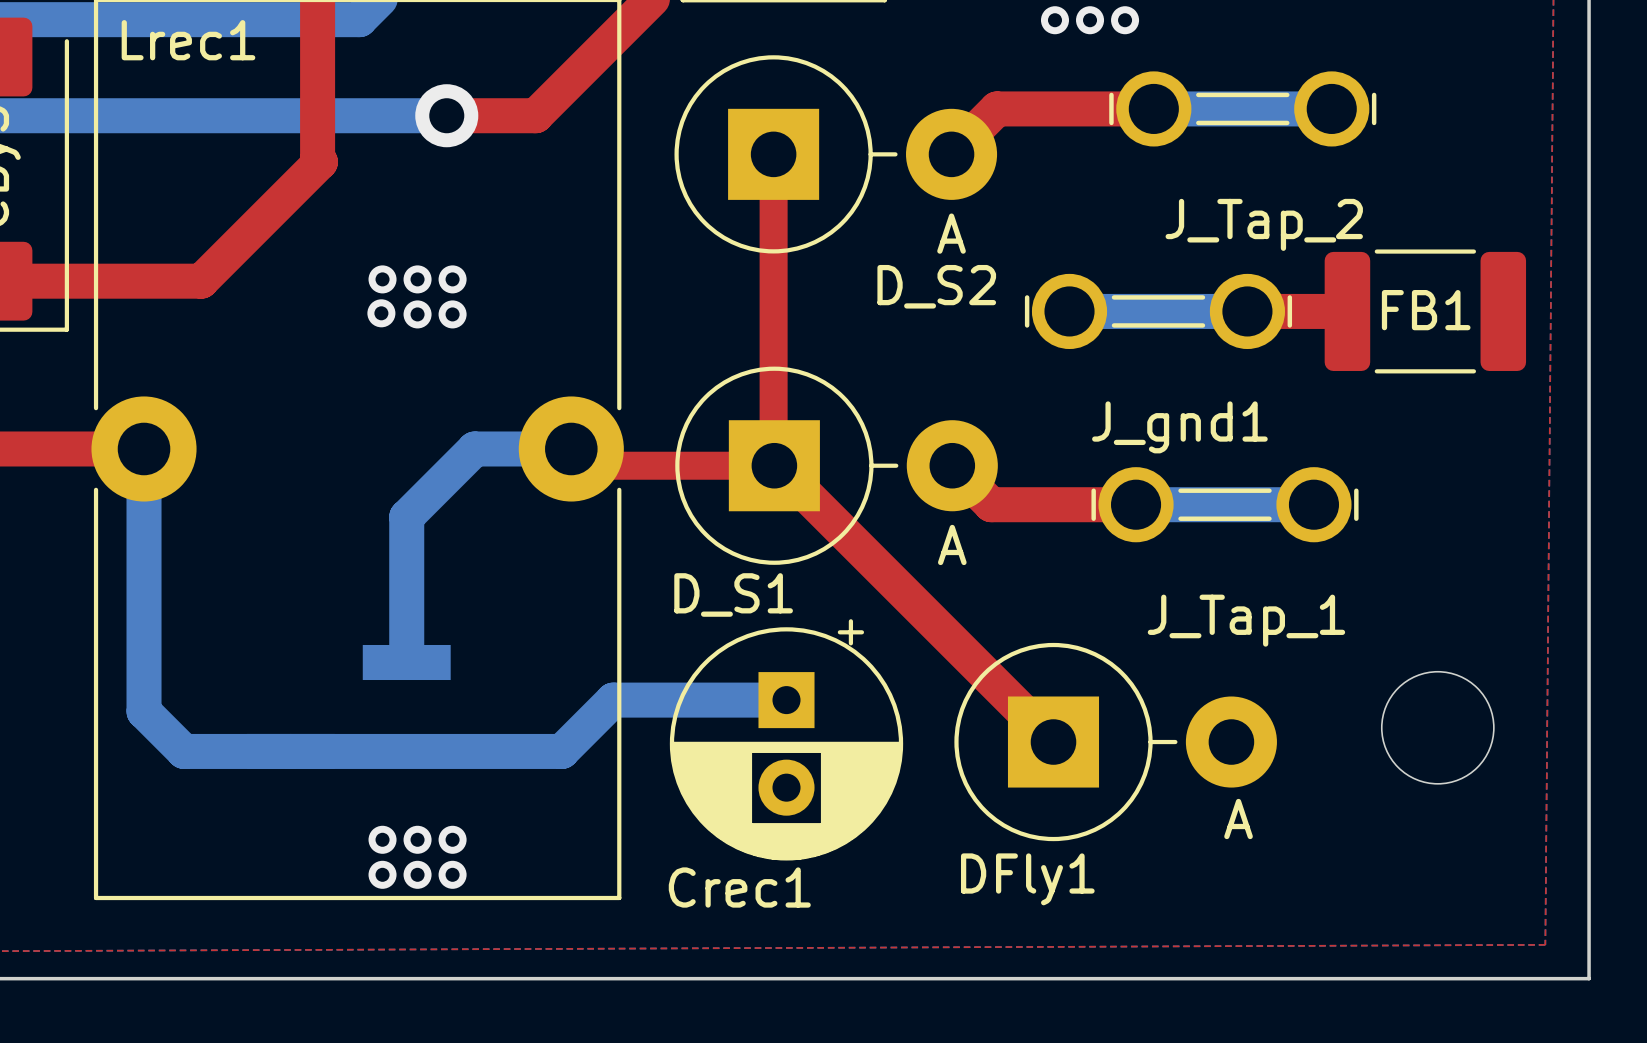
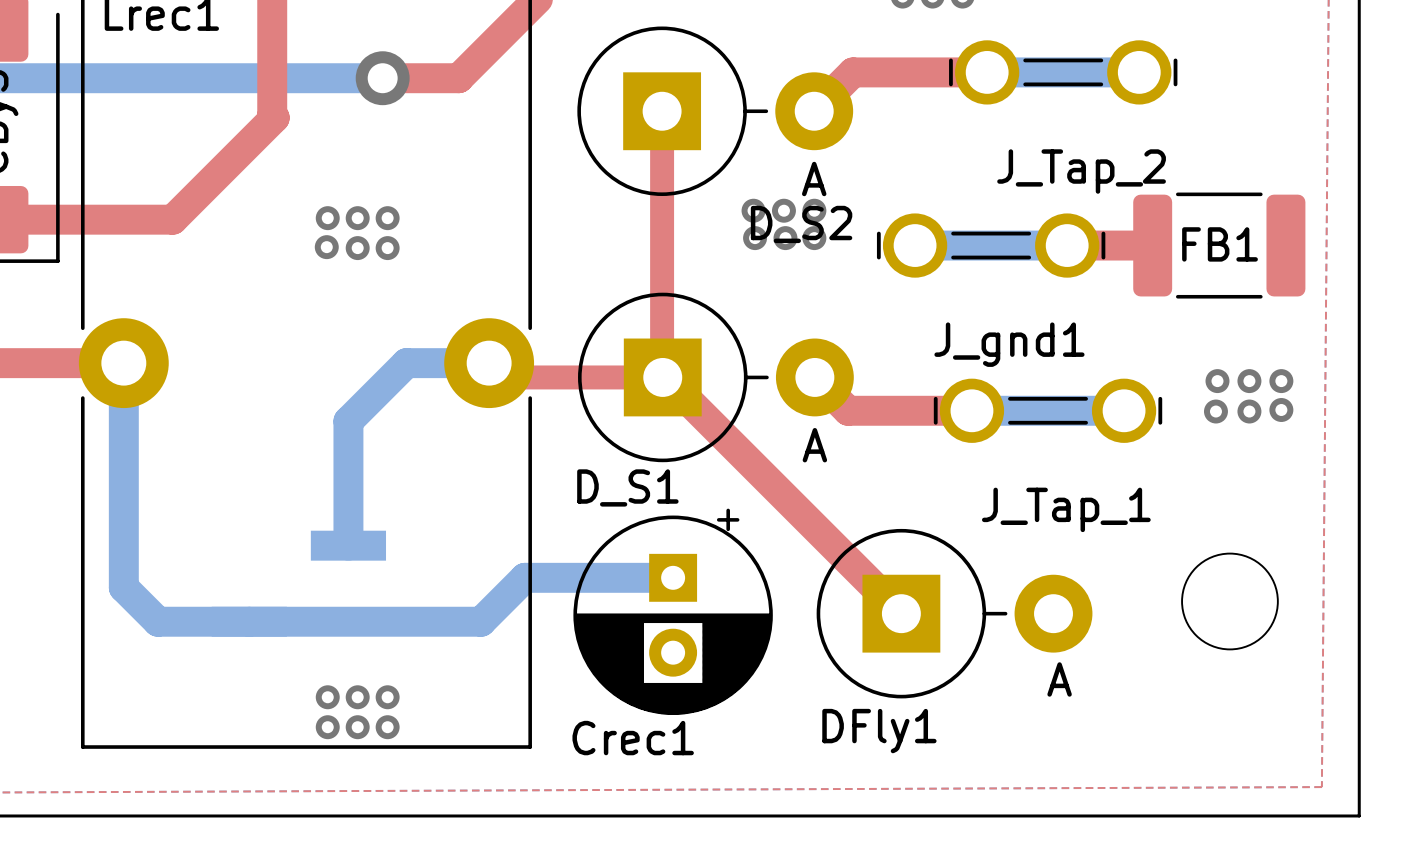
via: none -> (753, 210)
via: none -> (783, 210)
via: none -> (814, 210)
via: none -> (755, 238)
via: none -> (785, 238)
via: none -> (814, 238)
via: none -> (1217, 381)
via: none -> (1249, 381)
via: none -> (1281, 381)
via: none -> (1281, 409)
via: none -> (1215, 411)
via: none -> (1249, 411)

